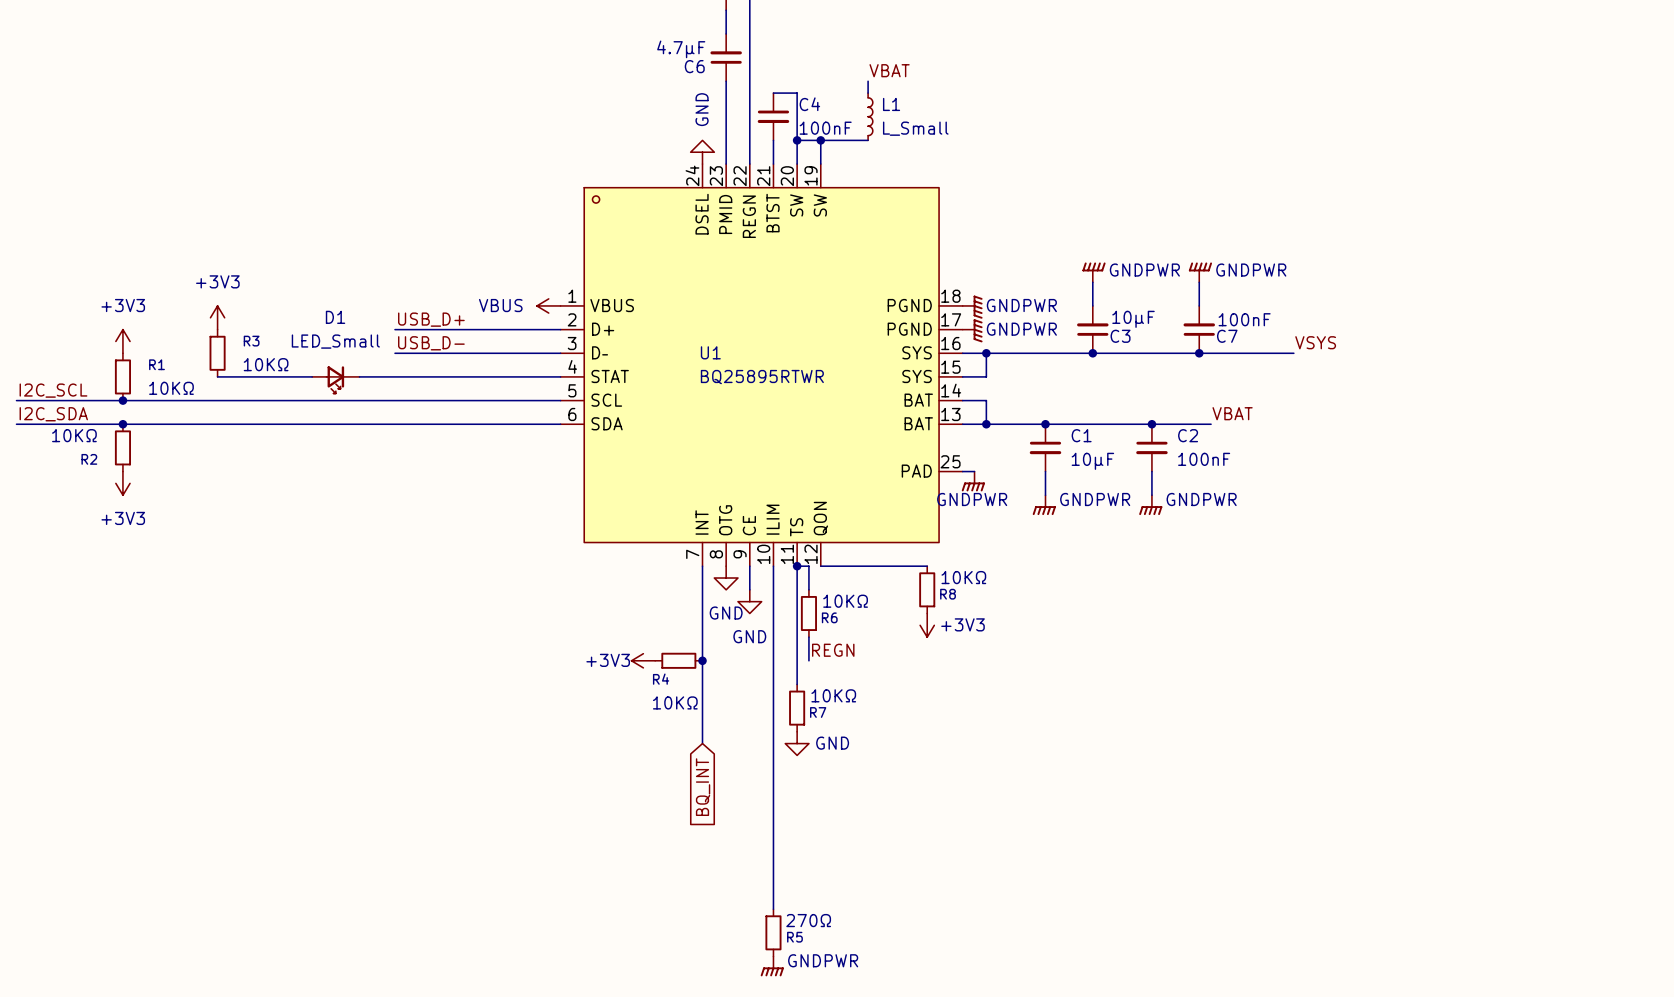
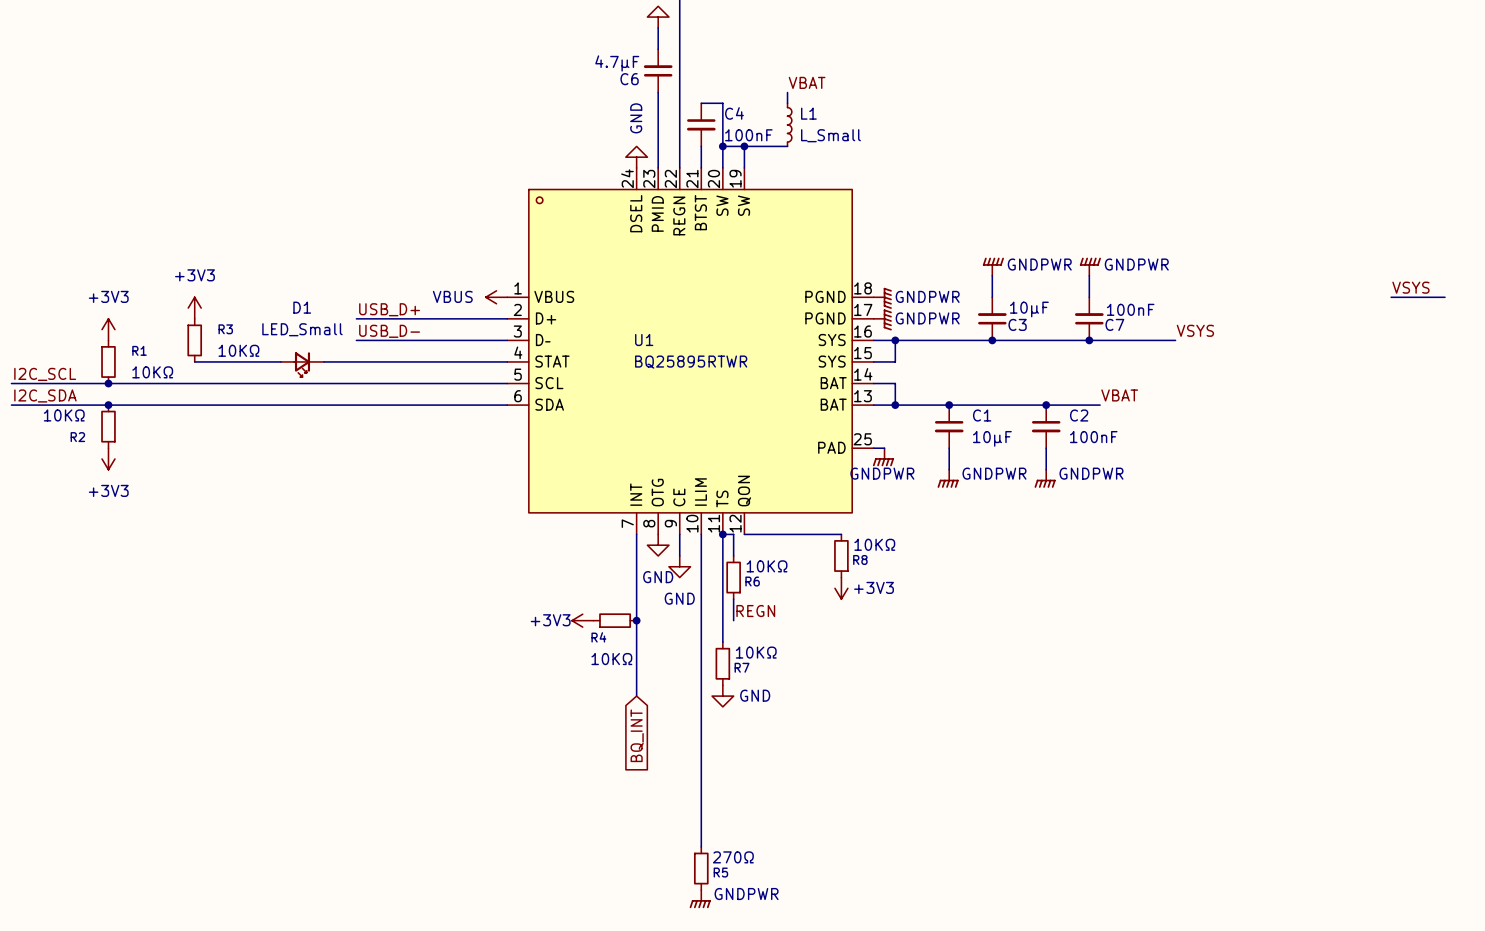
label: none -> VSYS (1410, 287)
wire: none -> (1391, 297) (1445, 297)

